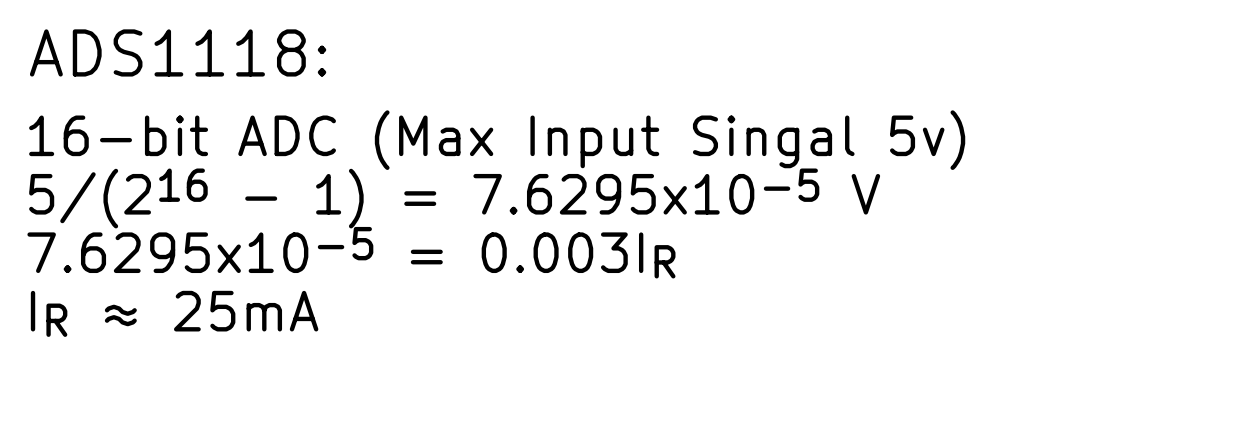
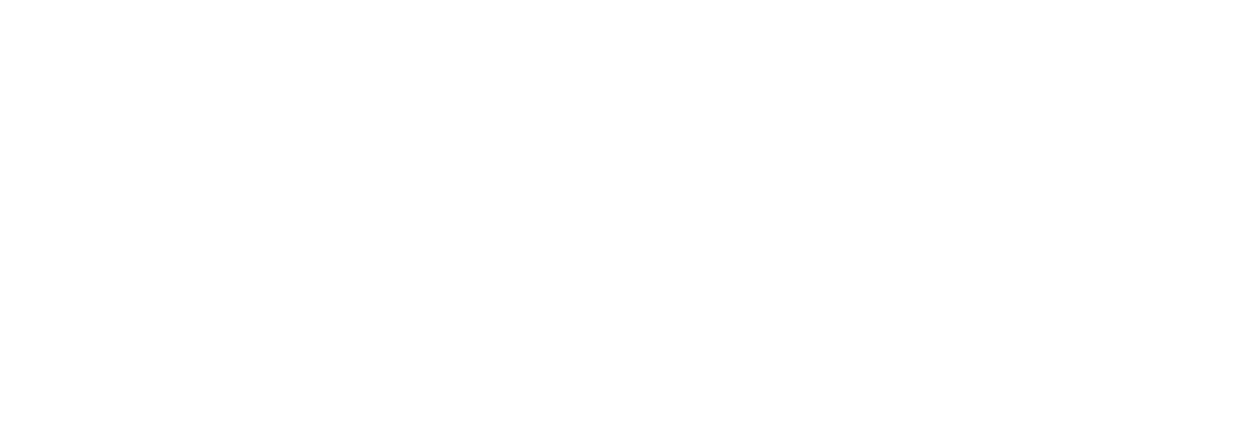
text: ADS1118: (178, 52) -> none
text: 16-bit ADC (Max Input Singal 5v) (497, 140) -> none
text: 5/(216 - 1) = 7.6295x10-5 V (454, 198) -> none
text: 7.6295x10-5 = 0.003IR (351, 252) -> none
text: IR ≈ 25mA (174, 313) -> none

